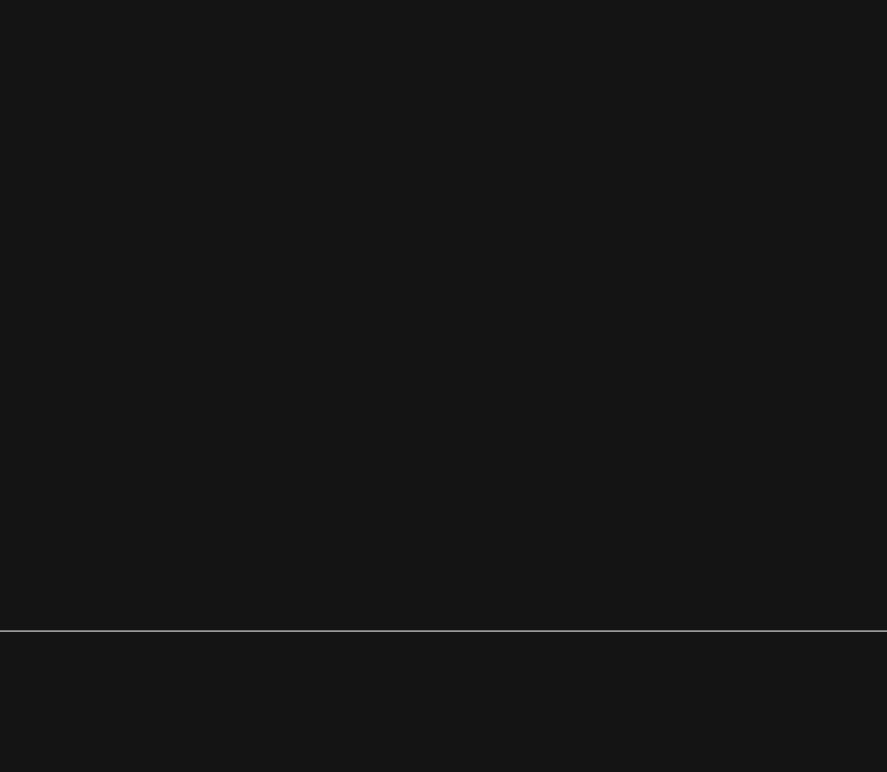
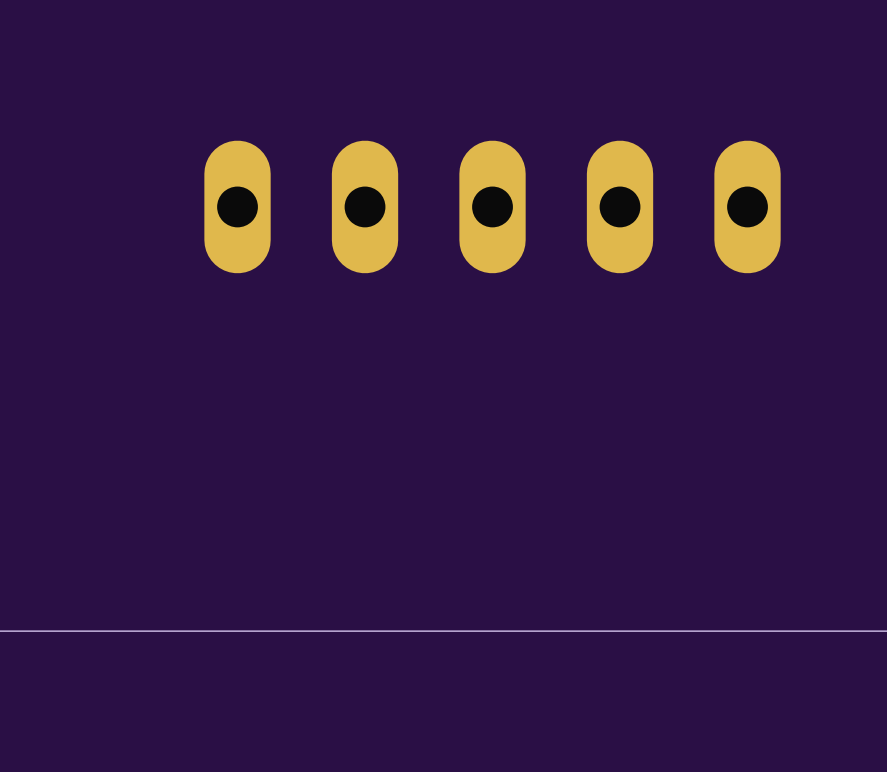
part: none -> (492, 206)

